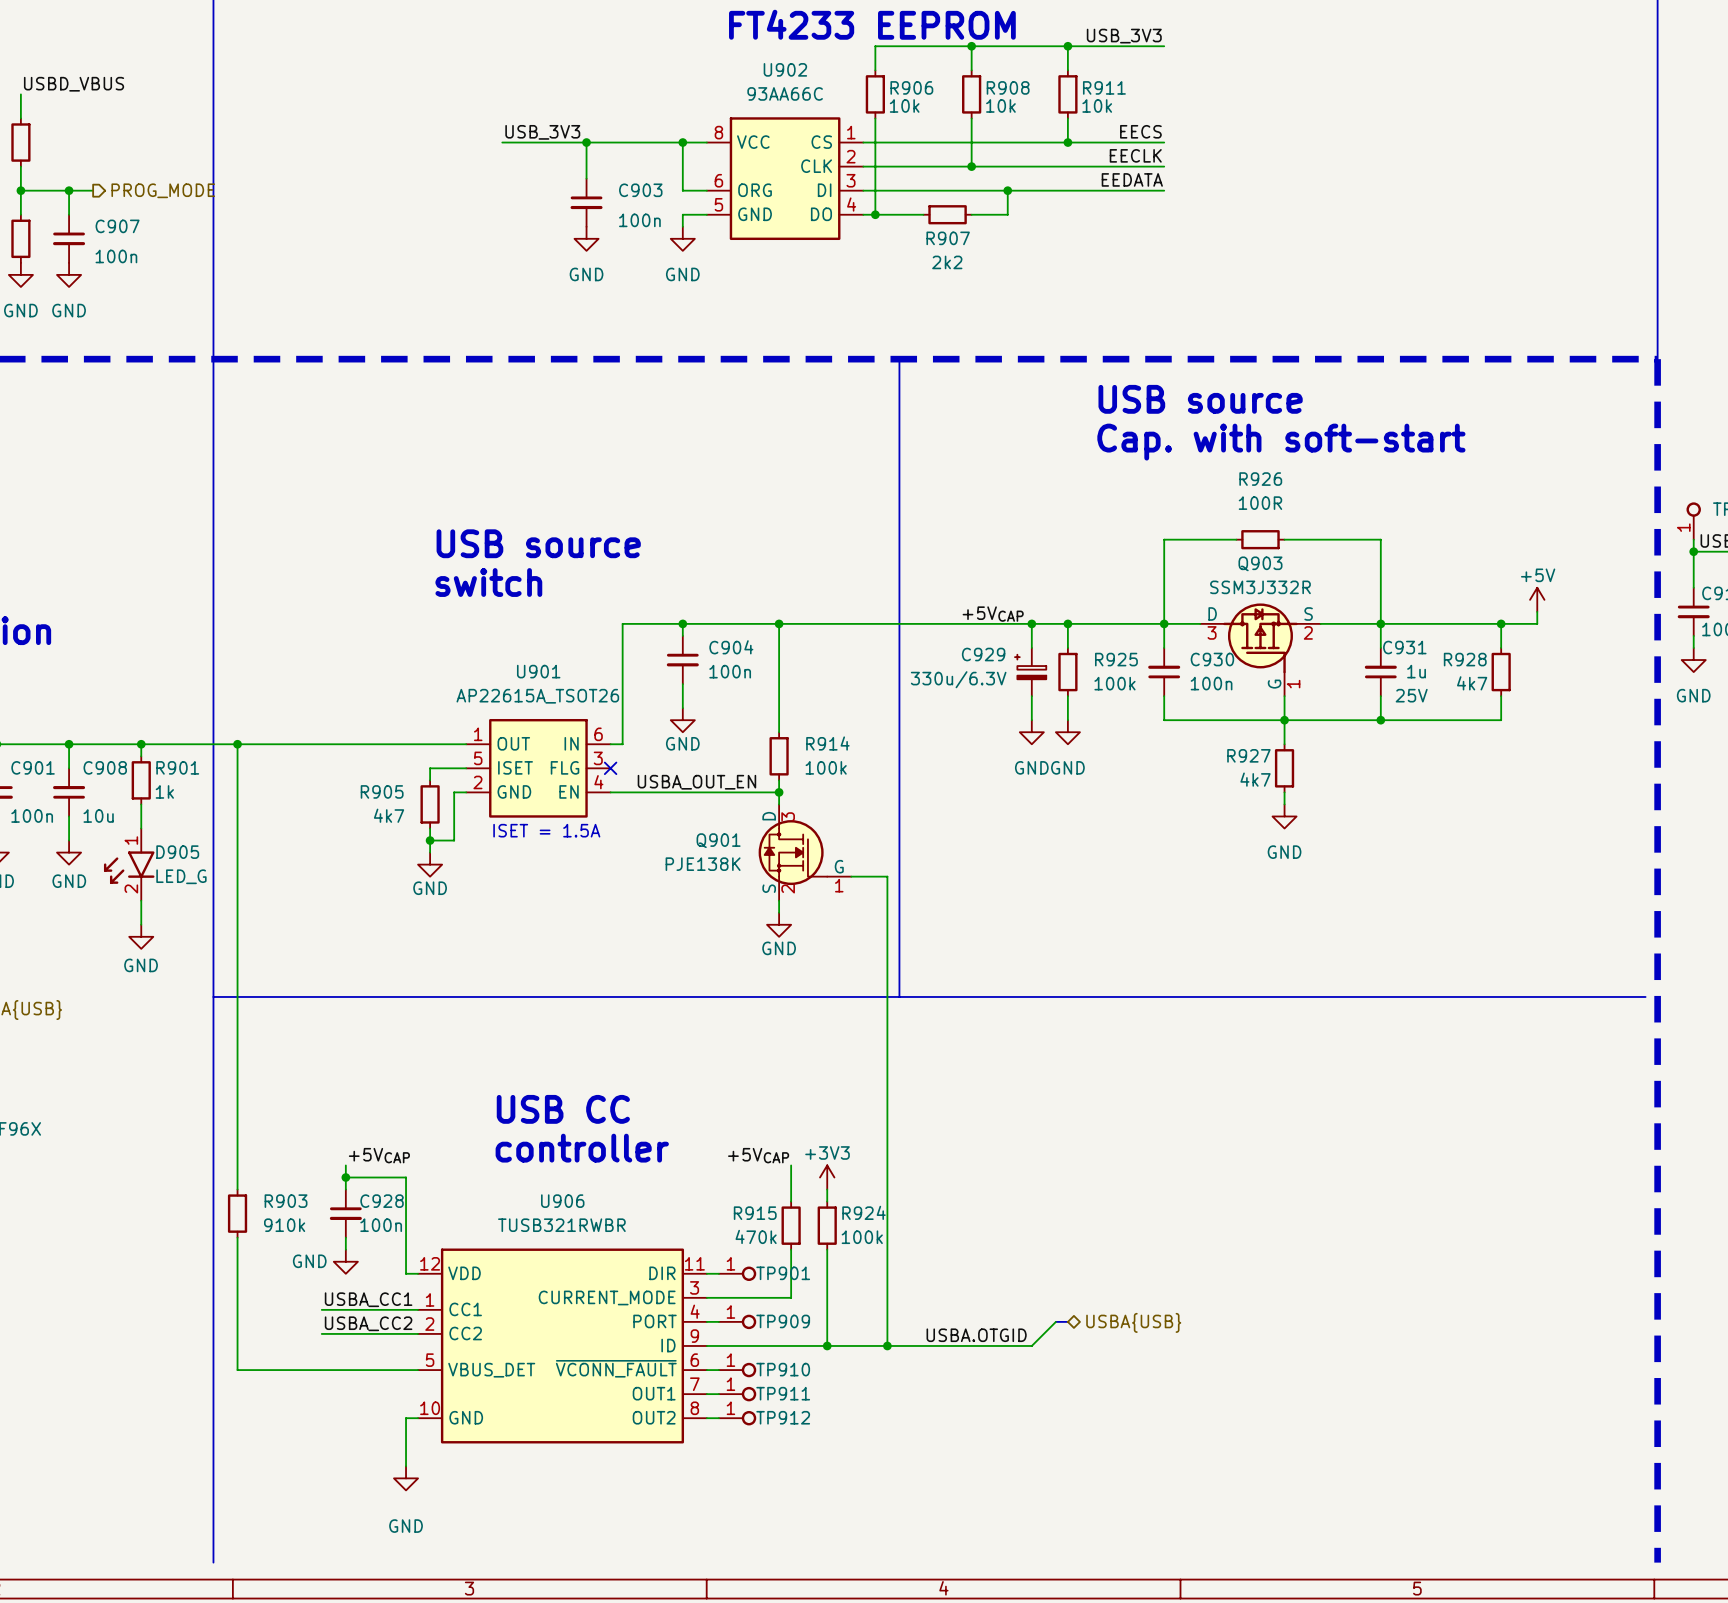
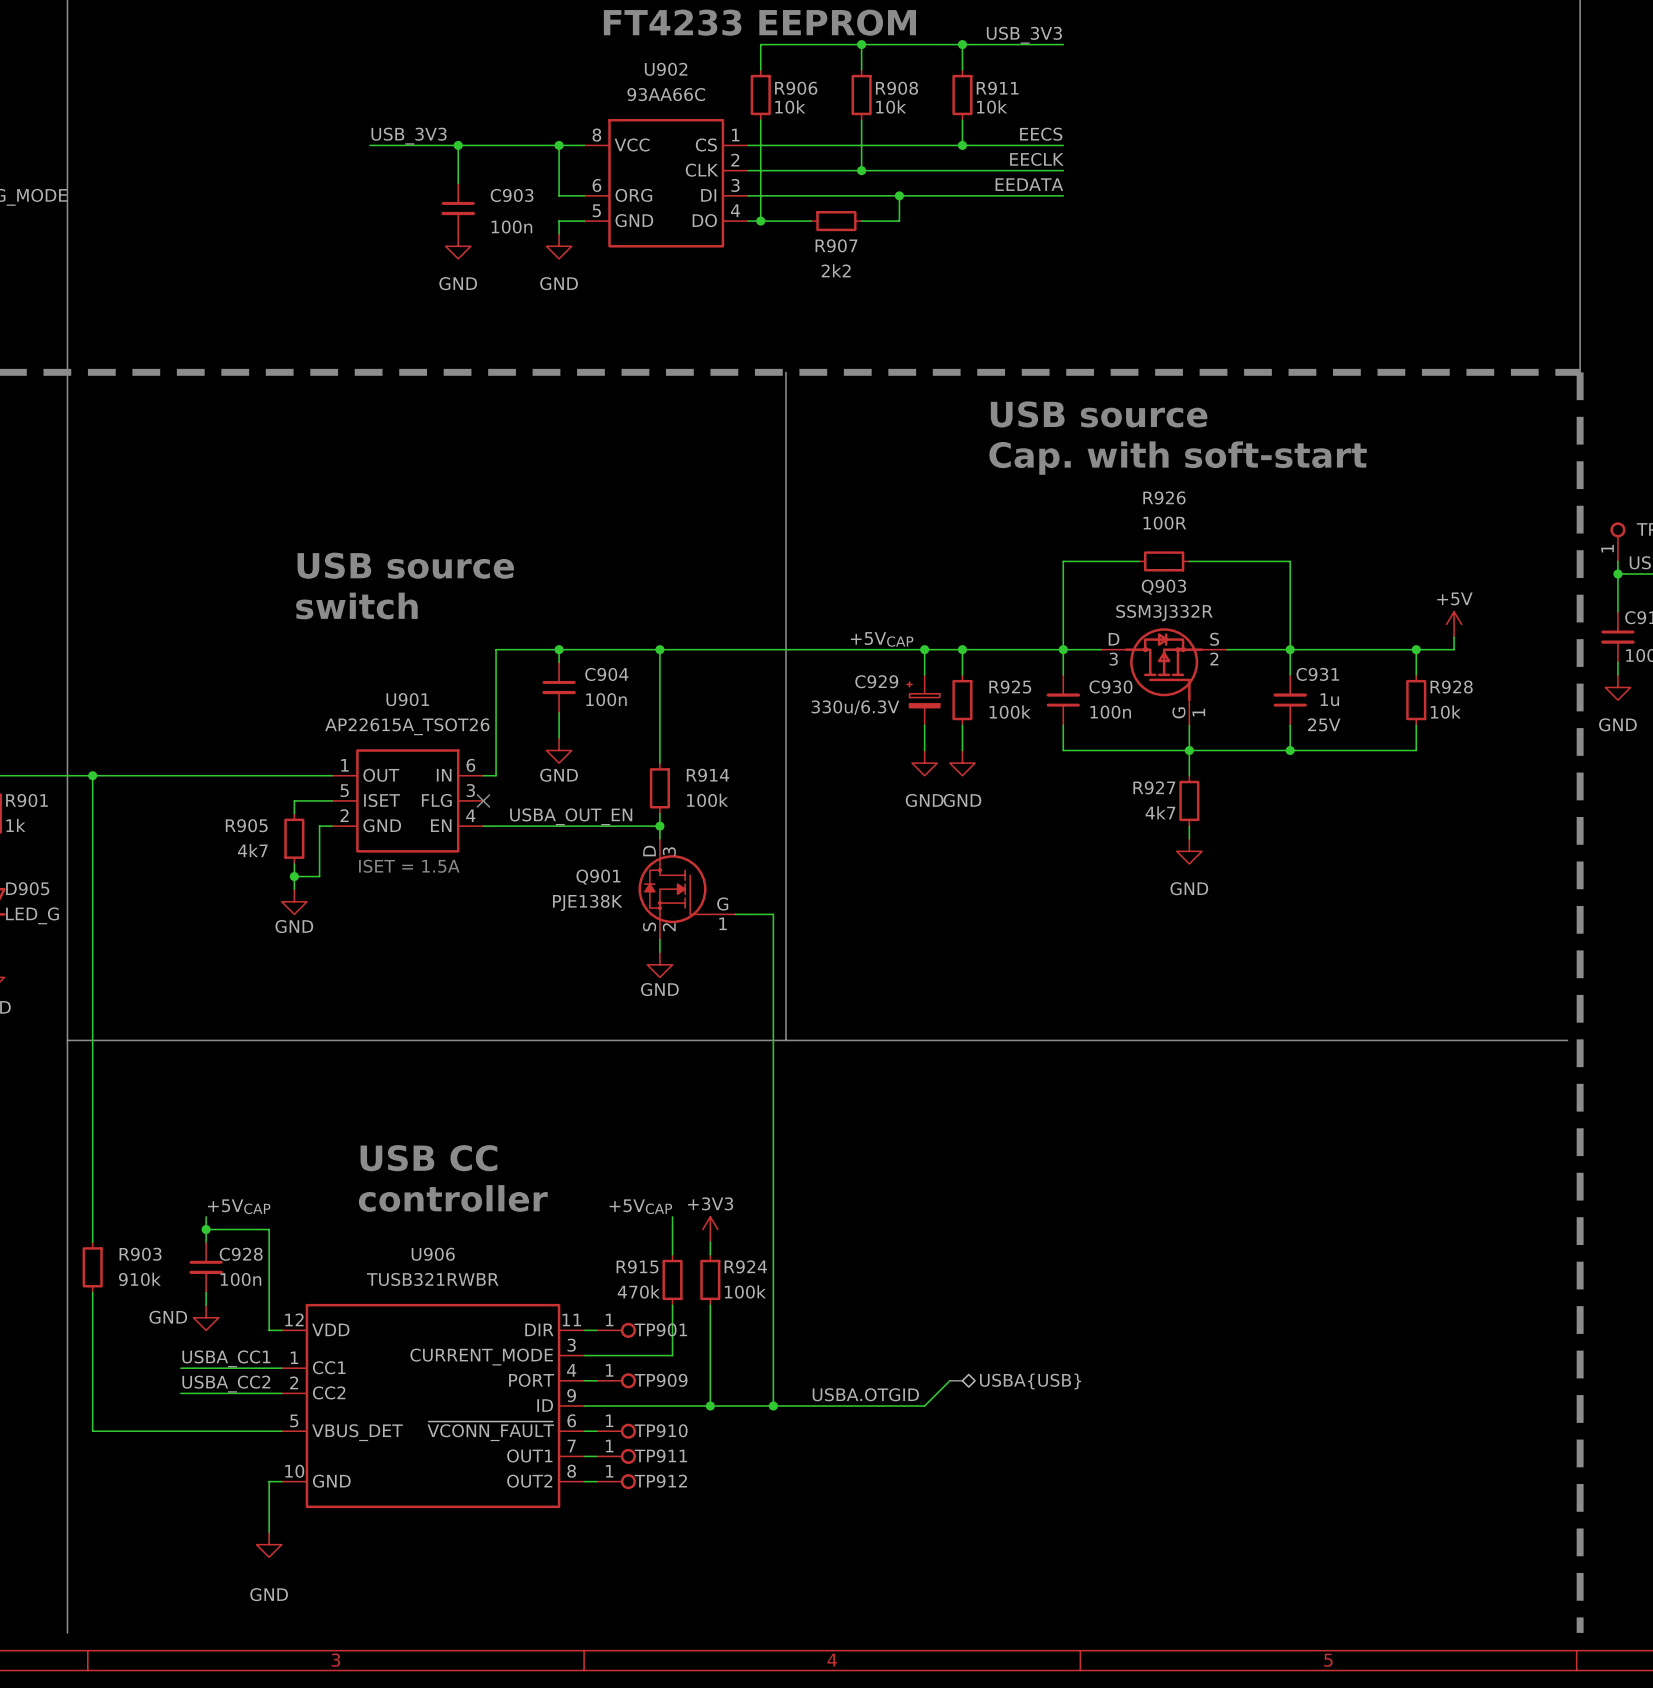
R928 name position: R928 (1465, 659) -> R928 (1451, 687)
R928 text: 4k7 (1472, 683) -> 10k (1445, 712)

